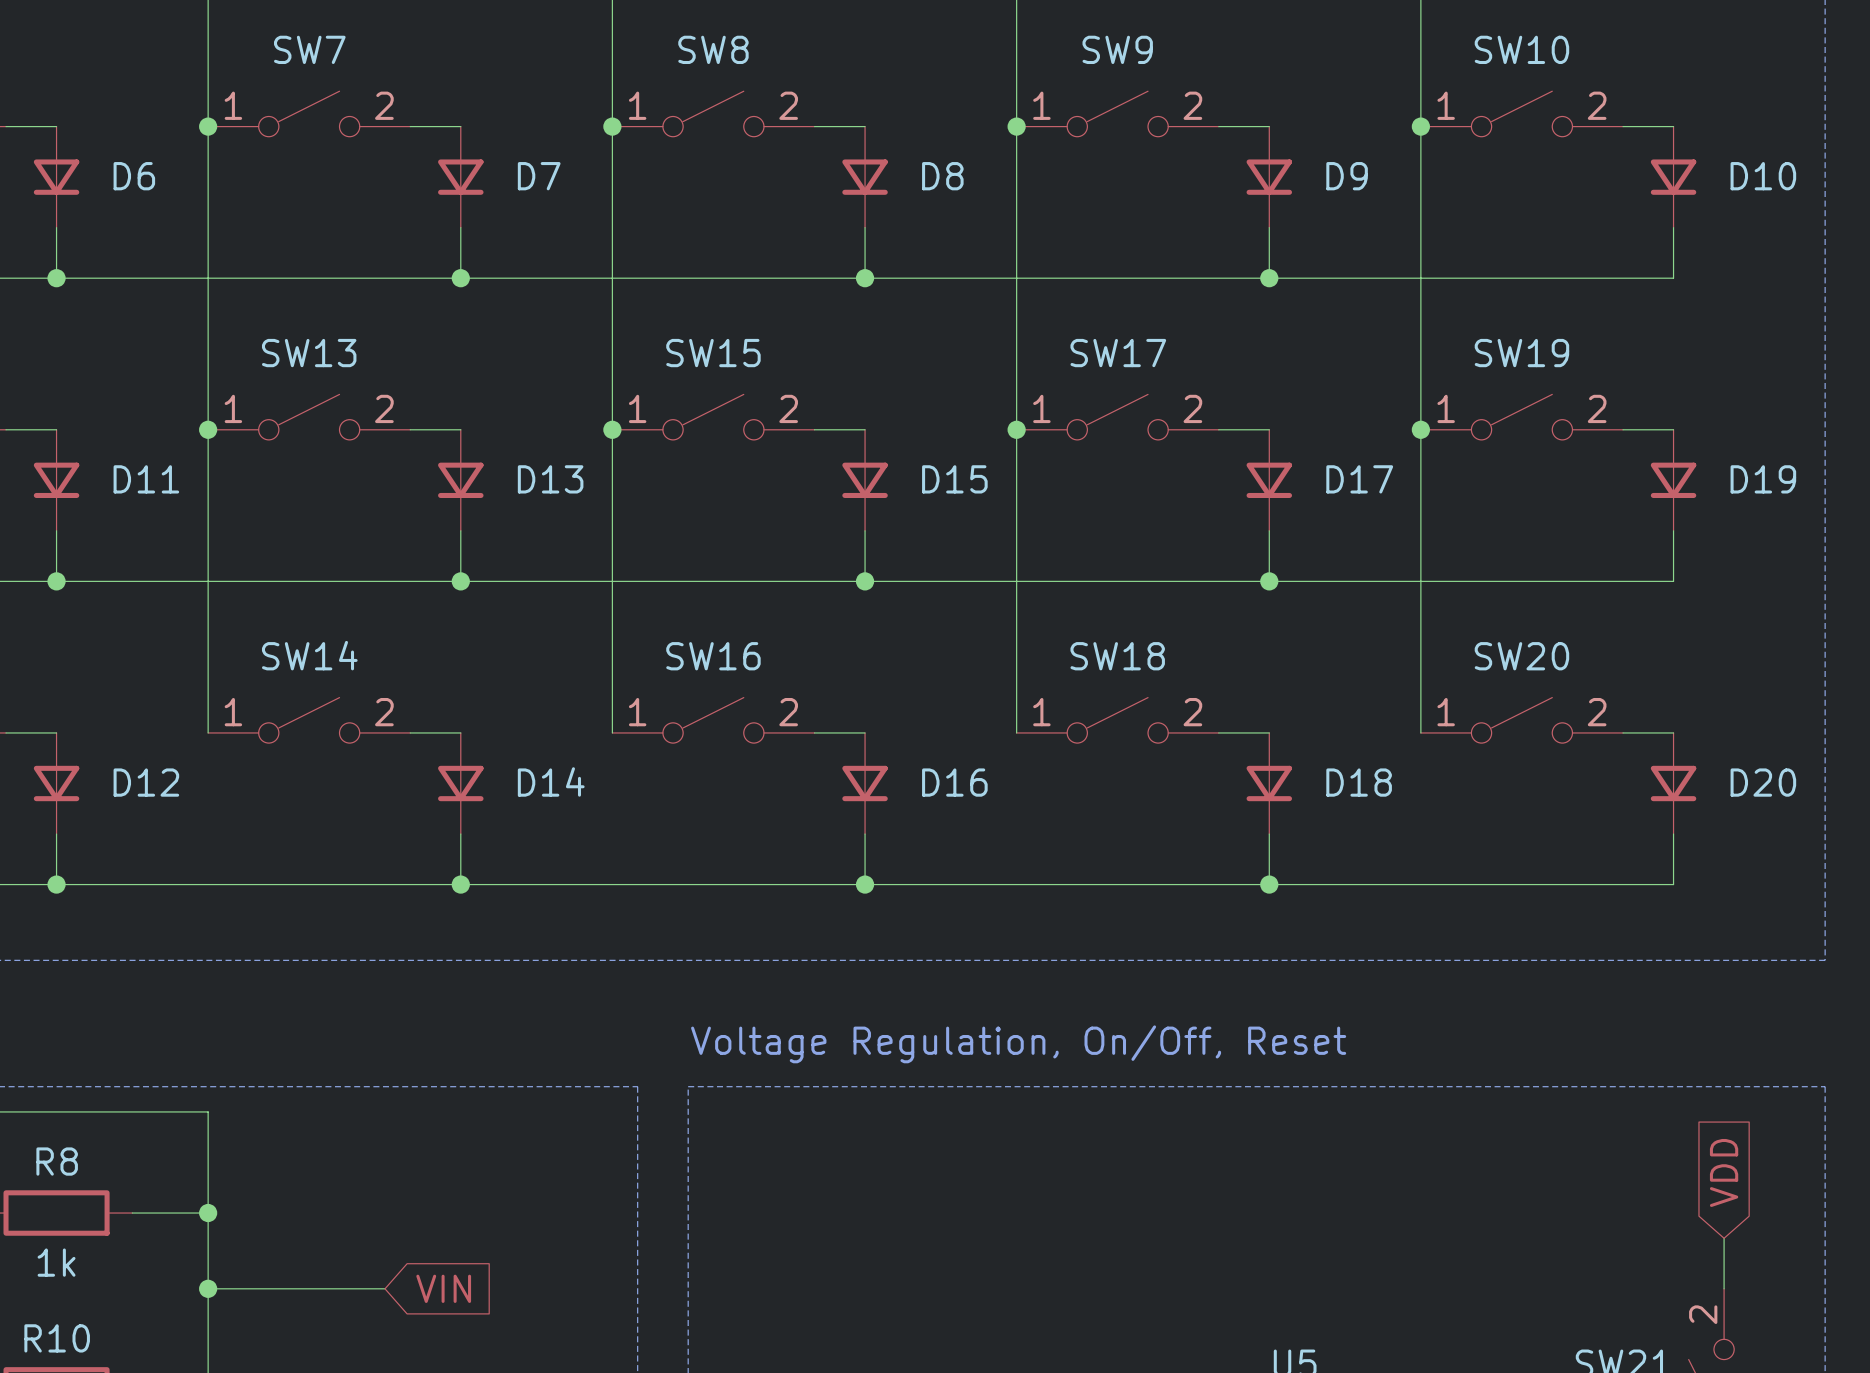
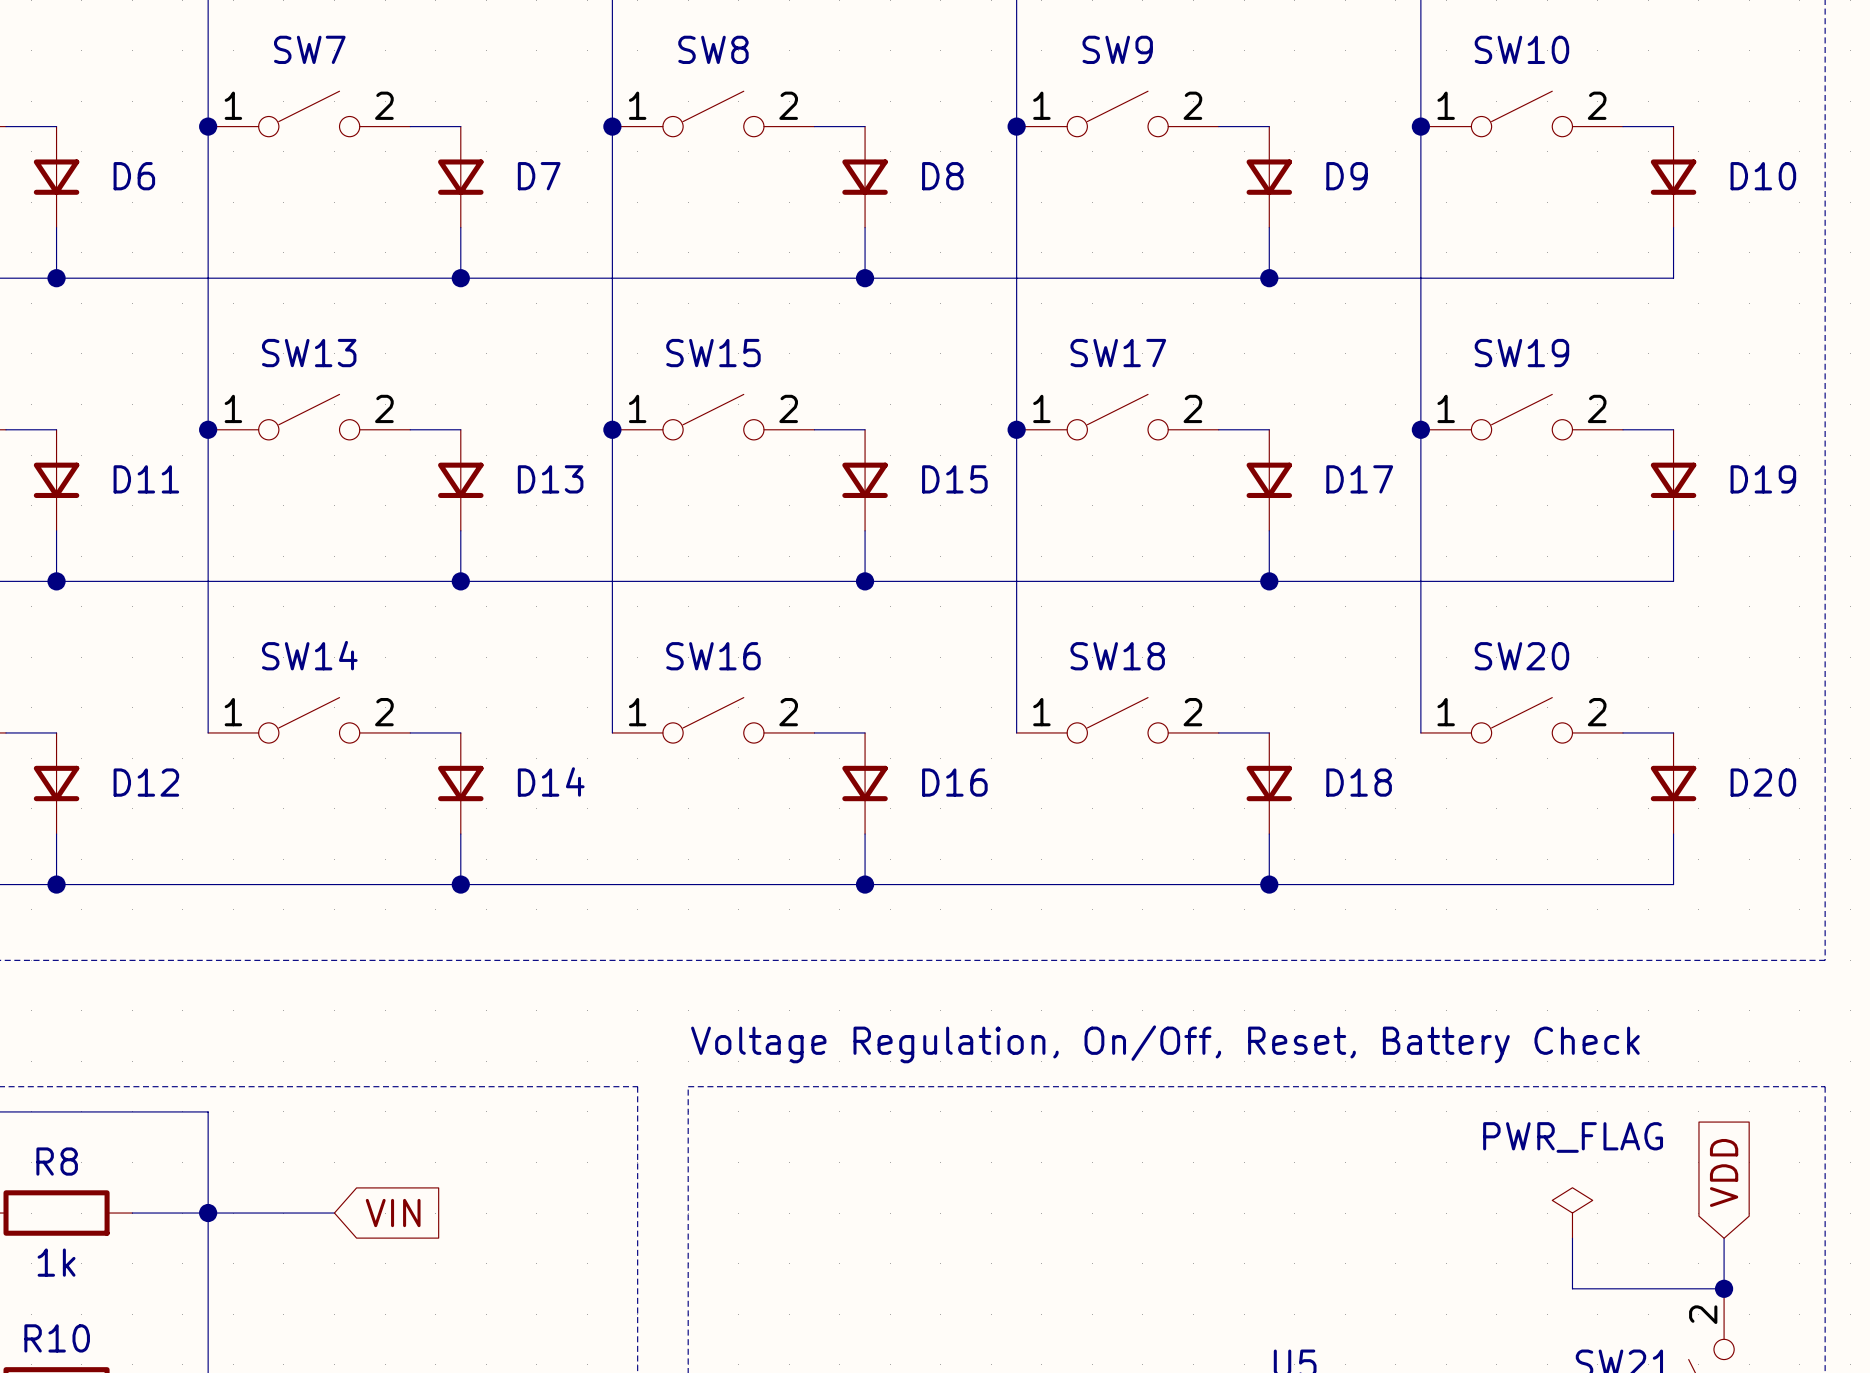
text: Voltage Regulation, On/Off, Reset (1018, 1044) -> Voltage Regulation, On/Off, Reset, Battery Check (1165, 1044)
wire: none -> (208, 1213) (334, 1213)
power symbol: none -> PWR_FLAG (1572, 1213)
wire: none -> (1572, 1238) (1572, 1288) (1724, 1288)
wire: (208, 1288) (385, 1288) -> none
junction: (208, 1288) -> none
global label position: VIN (443, 1288) -> VIN (393, 1213)
junction: none -> (1724, 1288)

